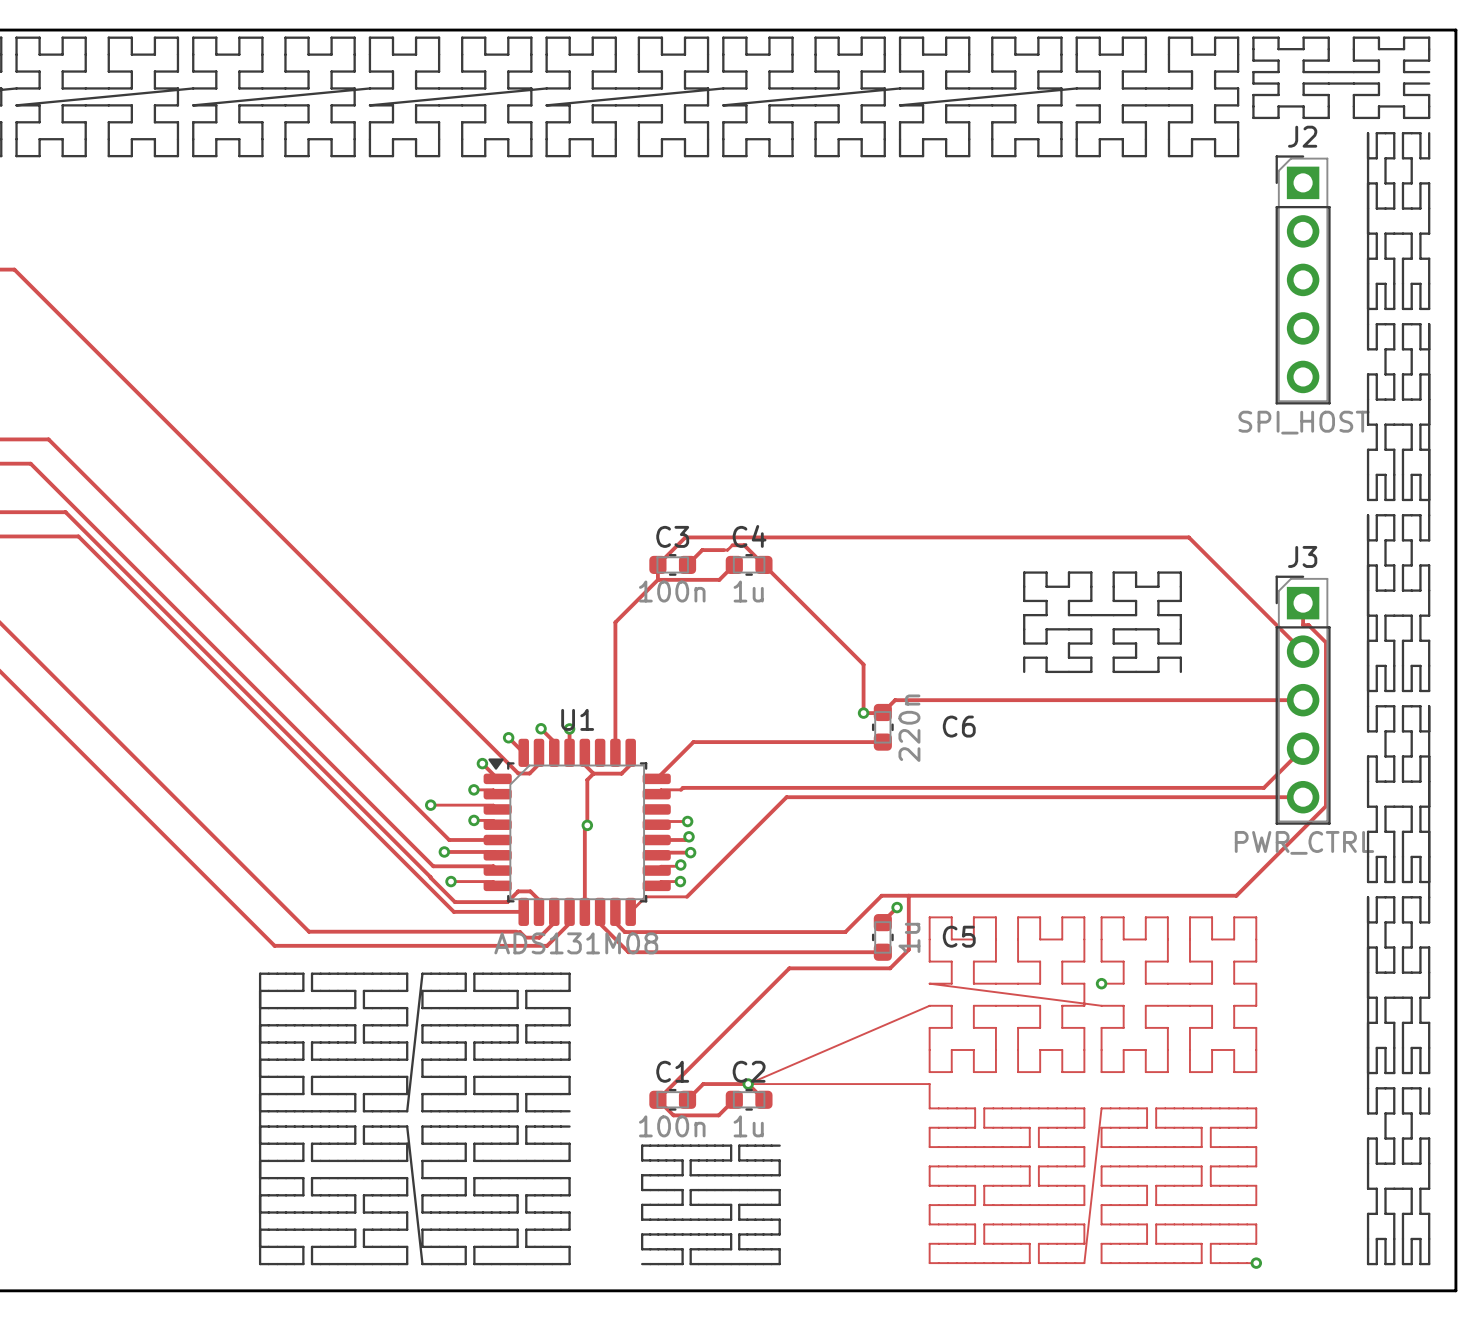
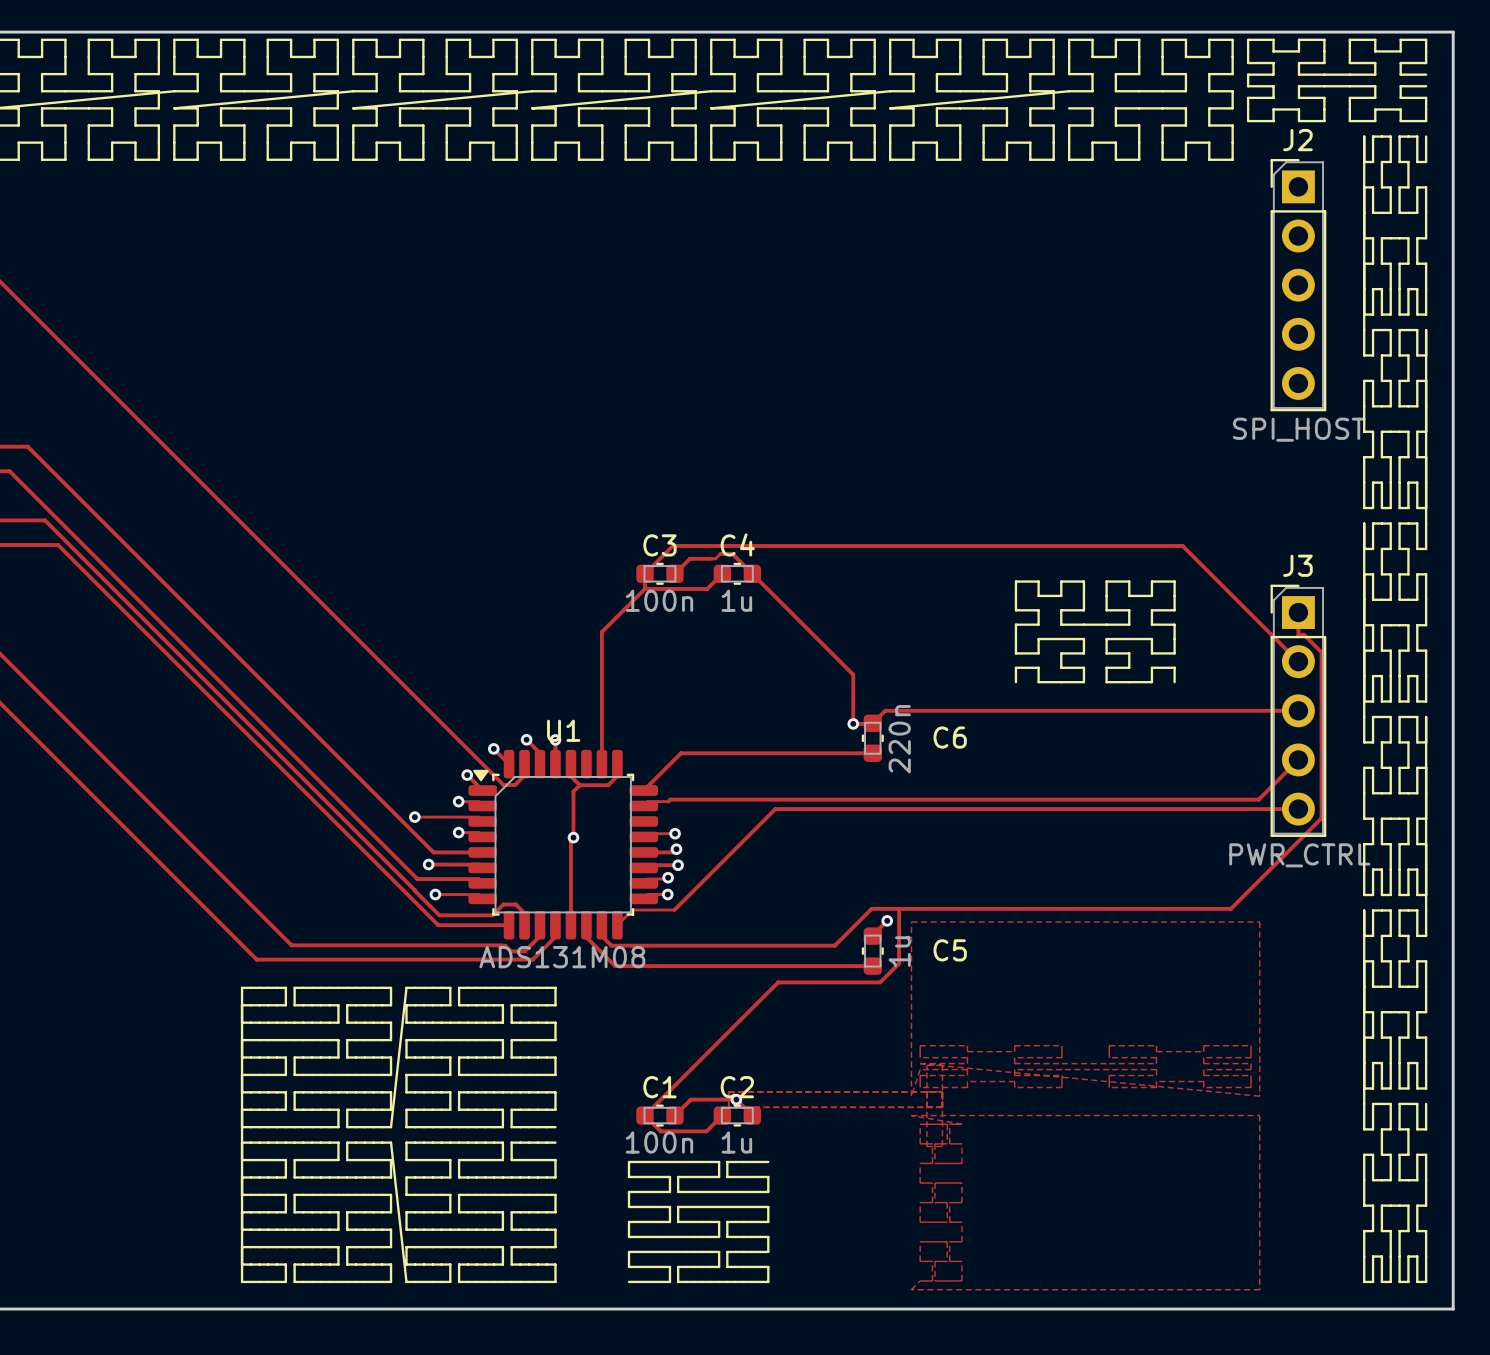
zone outline: none -> (911, 922) (1259, 922) (1259, 1096) (920, 1063) (967, 1063) (967, 1057) (920, 1057) (920, 1045) (967, 1045) (967, 1051) (1014, 1051) (1014, 1045) (1061, 1045) (1061, 1057) (1014, 1057) (1014, 1063) (1156, 1063) (1156, 1057) (1109, 1057) (1109, 1045) (1156, 1045) (1156, 1051) (1203, 1051) (1203, 1045) (1251, 1045) (1251, 1057) (1203, 1057) (1203, 1063) (1251, 1063) (1251, 1069) (1203, 1069) (1203, 1075) (1251, 1075) (1251, 1087) (1203, 1087) (1203, 1081) (1156, 1081) (1156, 1087) (1109, 1087) (1109, 1075) (1156, 1075) (1156, 1069) (1014, 1069) (1014, 1075) (1061, 1075) (1061, 1087) (1014, 1087) (1014, 1081) (967, 1081) (967, 1087) (920, 1087) (920, 1075) (967, 1075) (967, 1069) (920, 1069) (911, 1096) (911, 922)
track: (1101, 983) (1123, 983) (1123, 961) (1101, 961) (1101, 917) (1123, 917) (1123, 939) (1145, 939) (1145, 917) (1167, 917) (1167, 961) (1145, 961) (1145, 983) (1212, 983) (1212, 961) (1189, 961) (1189, 917) (1212, 917) (1212, 939) (1234, 939) (1234, 917) (1256, 917) (1256, 961) (1234, 961) (1234, 983) (1256, 983) (1256, 1005) (1234, 1005) (1234, 1027) (1256, 1027) (1256, 1072) (1234, 1072) (1234, 1049) (1212, 1049) (1212, 1072) (1189, 1072) (1189, 1027) (1212, 1027) (1212, 1005) (1145, 1005) (1145, 1027) (1167, 1027) (1167, 1072) (1145, 1072) (1145, 1049) (1123, 1049) (1123, 1072) (1101, 1072) (1101, 1027) (1123, 1027) (1123, 1005) (1101, 1005) (929, 983) (951, 983) (951, 961) (929, 961) (929, 917) (951, 917) (951, 939) (973, 939) (973, 917) (995, 917) (995, 961) (973, 961) (973, 983) (1040, 983) (1040, 961) (1018, 961) (1018, 917) (1040, 917) (1040, 939) (1062, 939) (1062, 917) (1084, 917) (1084, 961) (1062, 961) (1062, 983) (1084, 983) (1084, 1005) (1062, 1005) (1062, 1027) (1084, 1027) (1084, 1072) (1062, 1072) (1062, 1049) (1040, 1049) (1040, 1072) (1018, 1072) (1018, 1027) (1040, 1027) (1040, 1005) (973, 1005) (973, 1027) (995, 1027) (995, 1072) (973, 1072) (973, 1049) (951, 1049) (951, 1072) (929, 1072) (929, 1027) (951, 1027) (951, 1005) (929, 1005) (748, 1084) (929, 1084) (929, 1108) (975, 1108) (975, 1127) (929, 1127) (929, 1147) (1029, 1147) (1029, 1127) (984, 1127) (984, 1108) (1084, 1108) (1084, 1127) (1038, 1127) (1038, 1147) (1084, 1147) (1084, 1166) (1038, 1166) (1038, 1185) (1084, 1185) (1084, 1205) (984, 1205) (984, 1185) (1029, 1185) (1029, 1166) (929, 1166) (929, 1185) (975, 1185) (975, 1205) (929, 1205) (929, 1224) (975, 1224) (975, 1243) (929, 1243) (929, 1263) (1029, 1263) (1029, 1243) (984, 1243) (984, 1224) (1084, 1224) (1084, 1243) (1038, 1243) (1038, 1263) (1084, 1263) (1101, 1108) (1147, 1108) (1147, 1127) (1101, 1127) (1101, 1147) (1201, 1147) (1201, 1127) (1156, 1127) (1156, 1108) (1256, 1108) (1256, 1127) (1210, 1127) (1210, 1147) (1256, 1147) (1256, 1166) (1210, 1166) (1210, 1185) (1256, 1185) (1256, 1205) (1156, 1205) (1156, 1185) (1201, 1185) (1201, 1166) (1101, 1166) (1101, 1185) (1147, 1185) (1147, 1205) (1101, 1205) (1101, 1224) (1147, 1224) (1147, 1243) (1101, 1243) (1101, 1263) (1201, 1263) (1201, 1243) (1156, 1243) (1156, 1224) (1256, 1224) (1256, 1243) (1210, 1243) (1210, 1263) (1256, 1263) -> none
via: (1101, 983) -> none
zone outline: none -> (926, 1065) (942, 1065) (942, 1146) (926, 1146) (926, 1065)
zone outline: none -> (942, 1091) (728, 1091) (728, 1107) (942, 1107)
zone outline: none -> (911, 1115) (1259, 1115) (1259, 1289) (911, 1289) (920, 1280) (932, 1280) (932, 1261) (920, 1261) (920, 1241) (947, 1241) (947, 1261) (934, 1261) (934, 1280) (961, 1280) (961, 1261) (949, 1261) (949, 1241) (961, 1241) (961, 1222) (949, 1222) (949, 1202) (961, 1202) (961, 1183) (934, 1183) (934, 1202) (947, 1202) (947, 1222) (920, 1222) (920, 1202) (932, 1202) (932, 1183) (920, 1183) (920, 1163) (932, 1163) (932, 1143) (920, 1143) (920, 1124) (947, 1124) (947, 1143) (934, 1143) (934, 1163) (961, 1163) (961, 1143) (949, 1143) (949, 1124) (961, 1124) (911, 1115)
via: (1256, 1263) -> none

